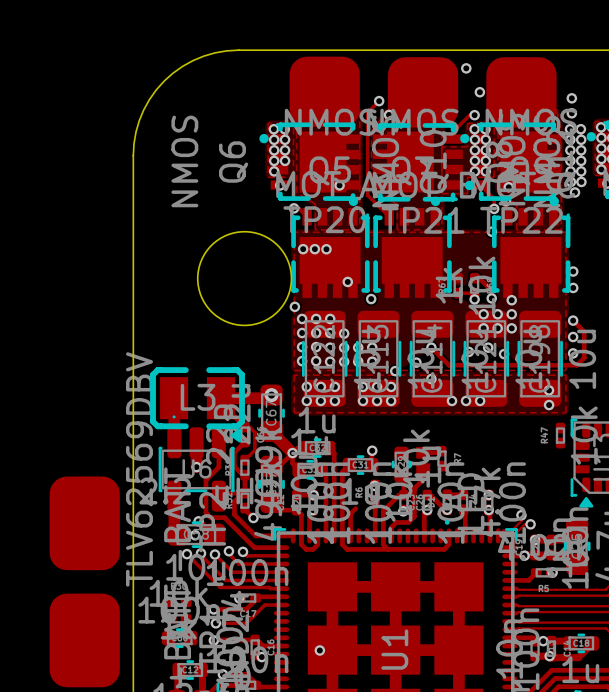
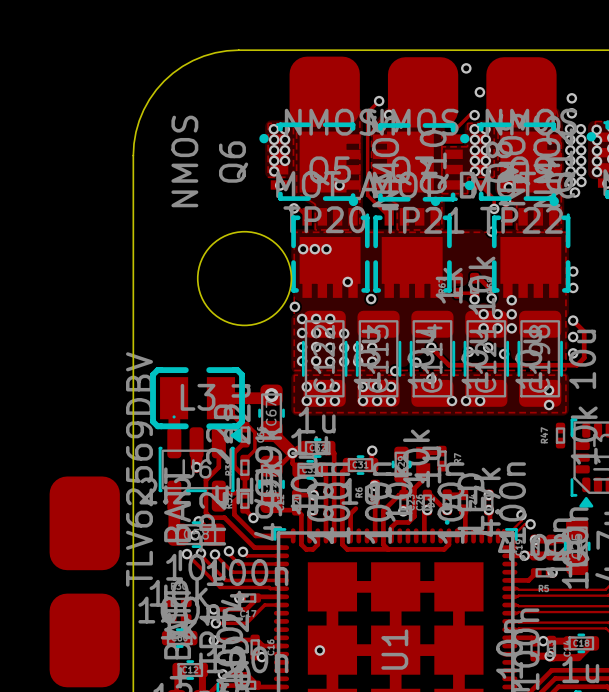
via: (601, 127) -> none
via: none -> (596, 129)
via: (601, 137) -> none
via: none -> (596, 140)
via: (601, 148) -> none
via: none -> (596, 150)
via: (601, 158) -> none
via: none -> (596, 161)
via: (601, 169) -> none
via: none -> (596, 171)

